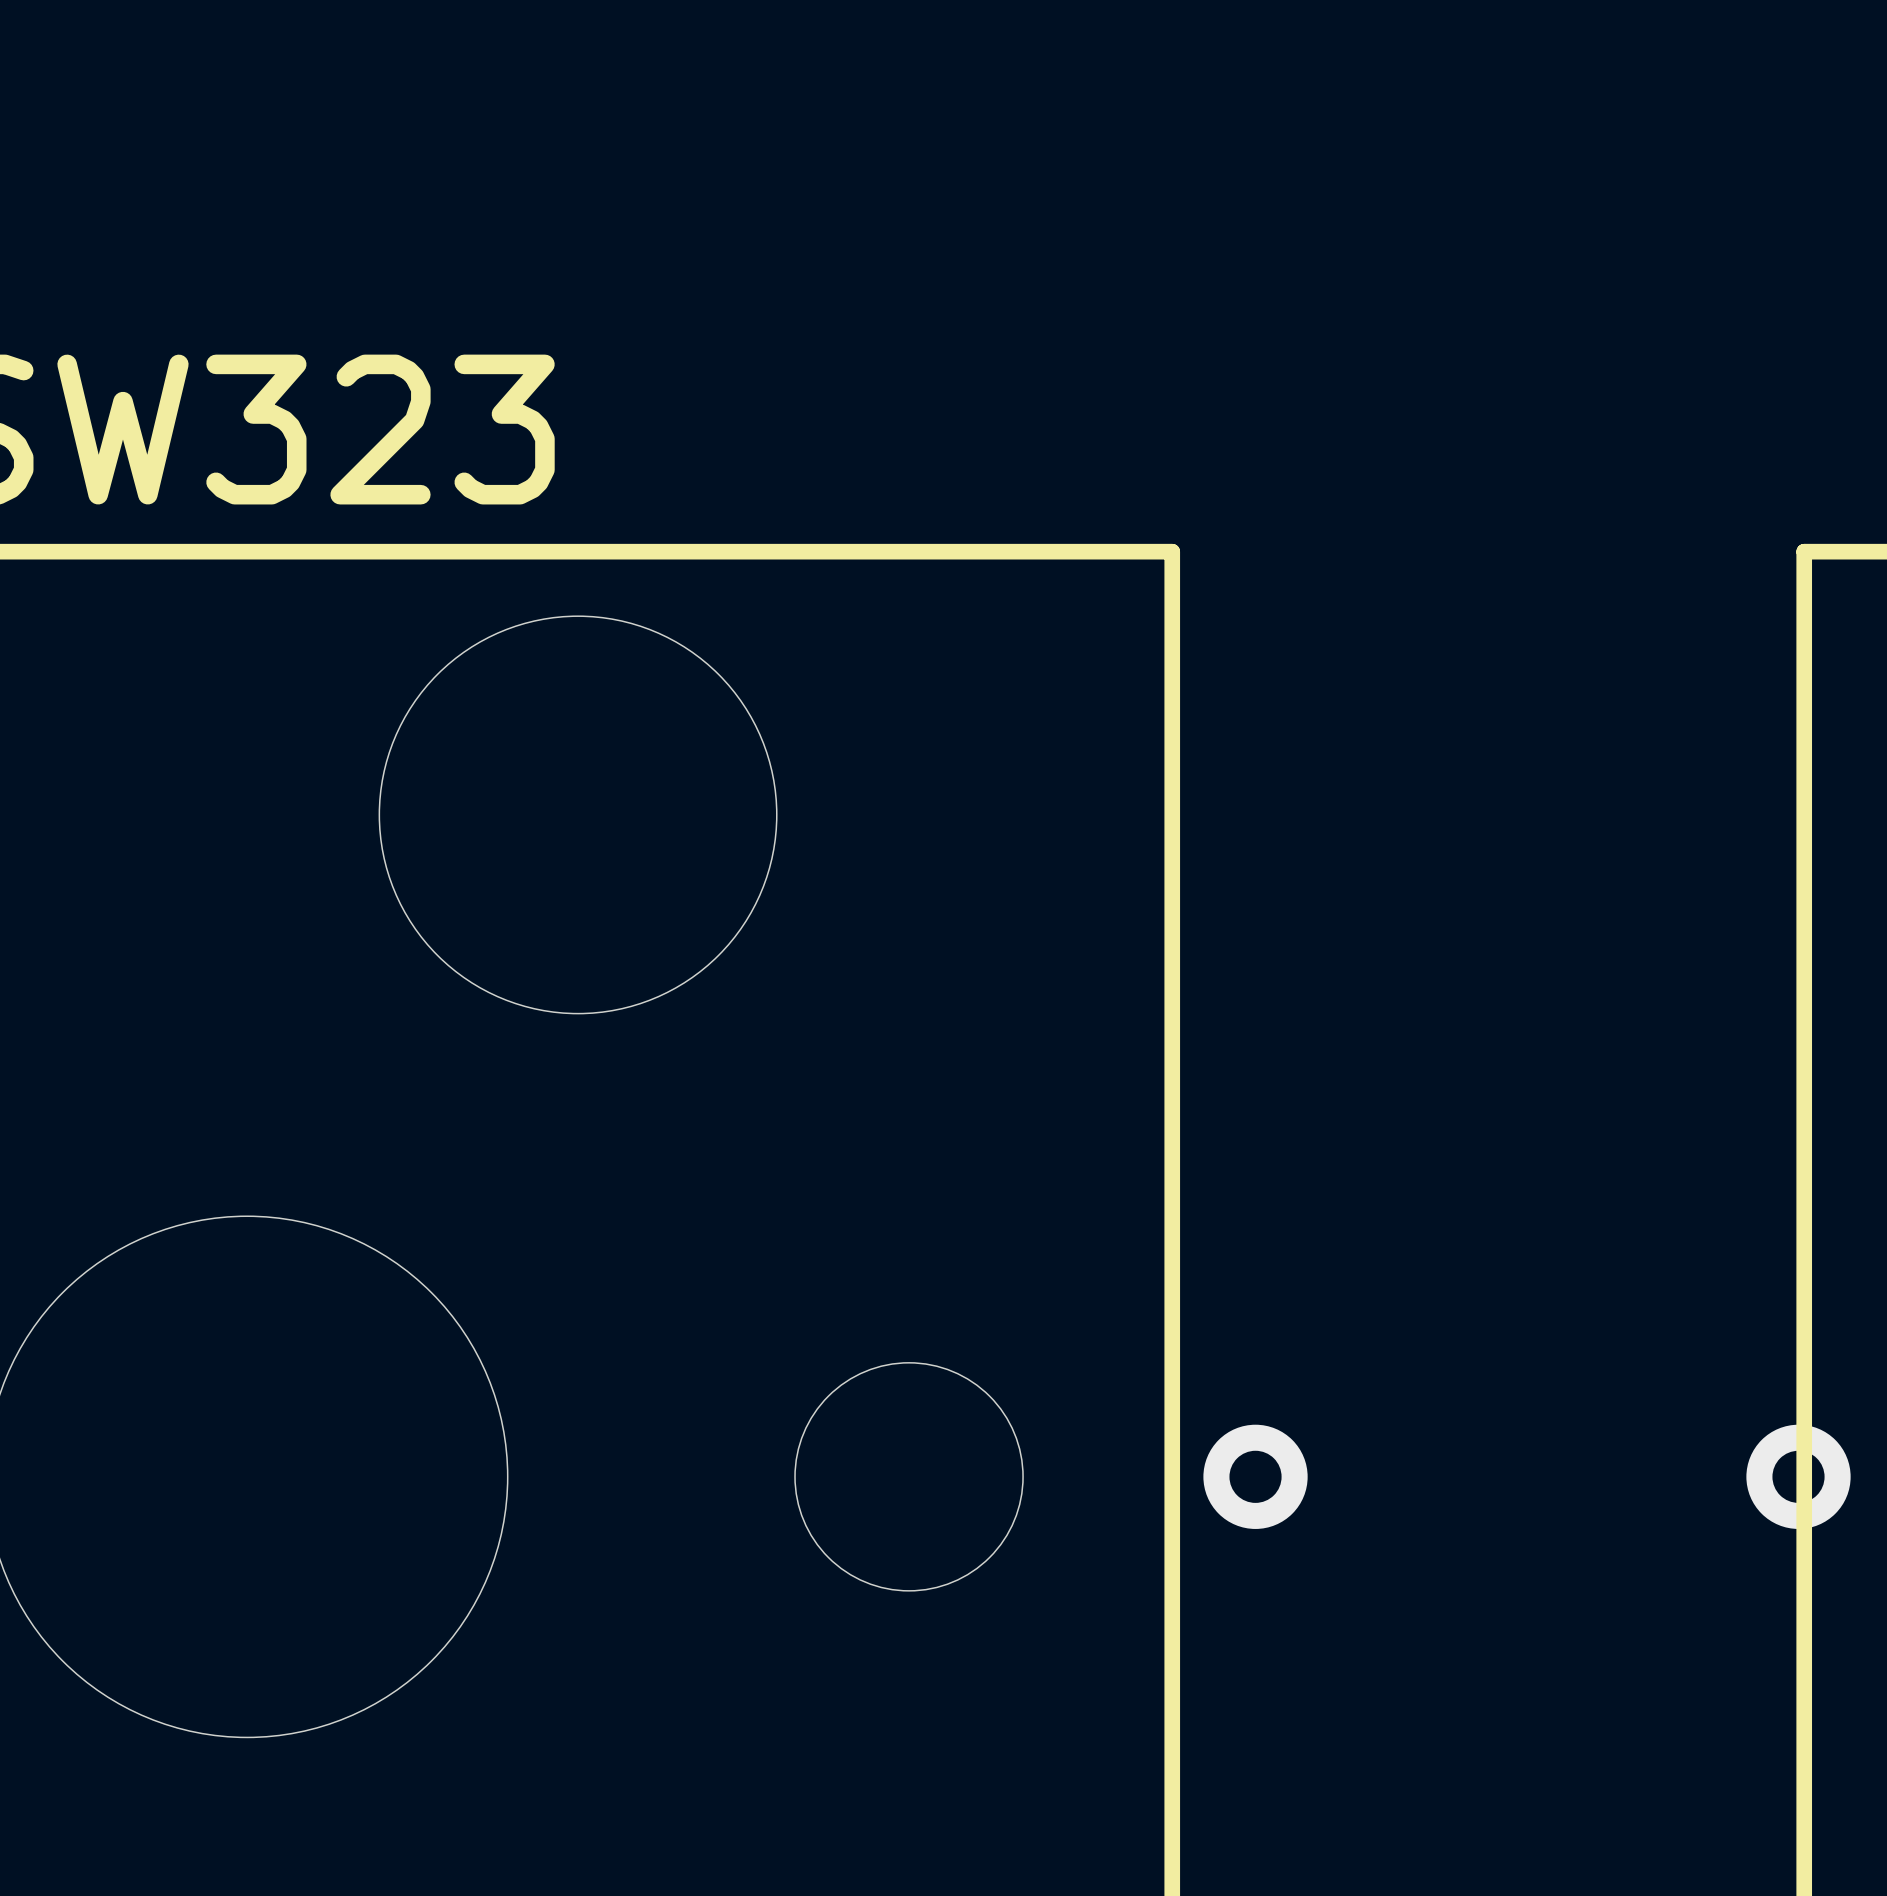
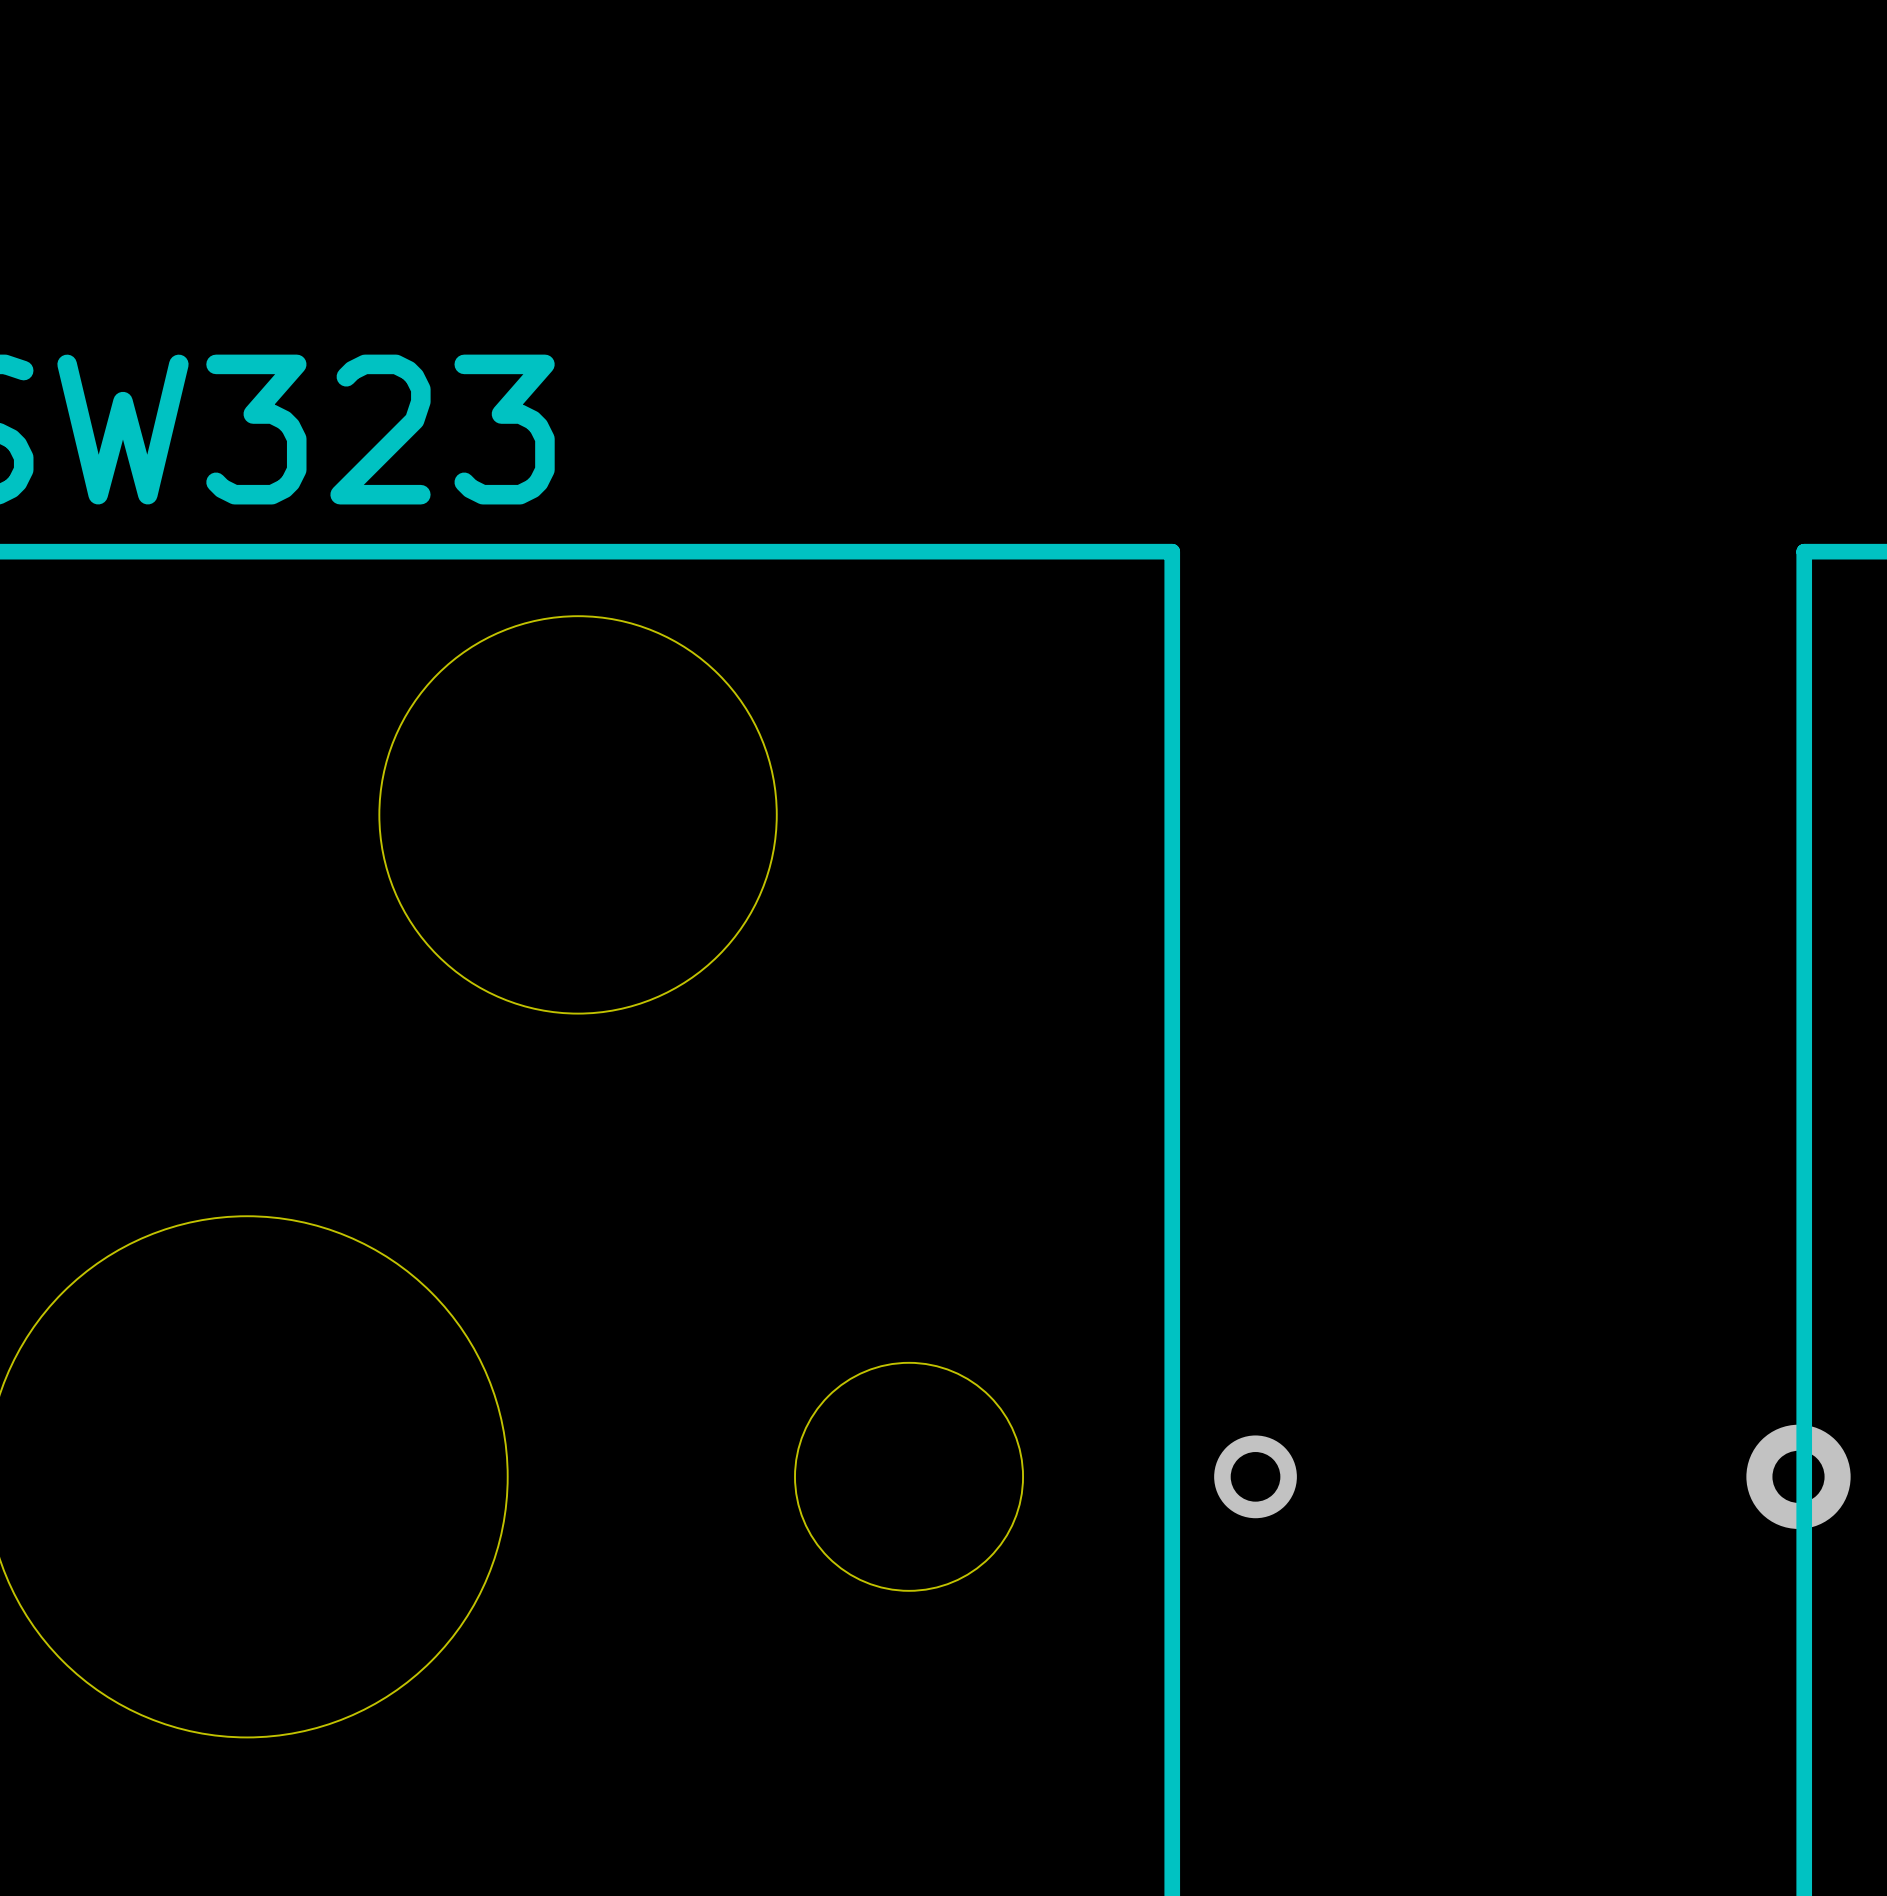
via size: [1203, 1424, 1308, 1529] -> [1214, 1435, 1297, 1519]

